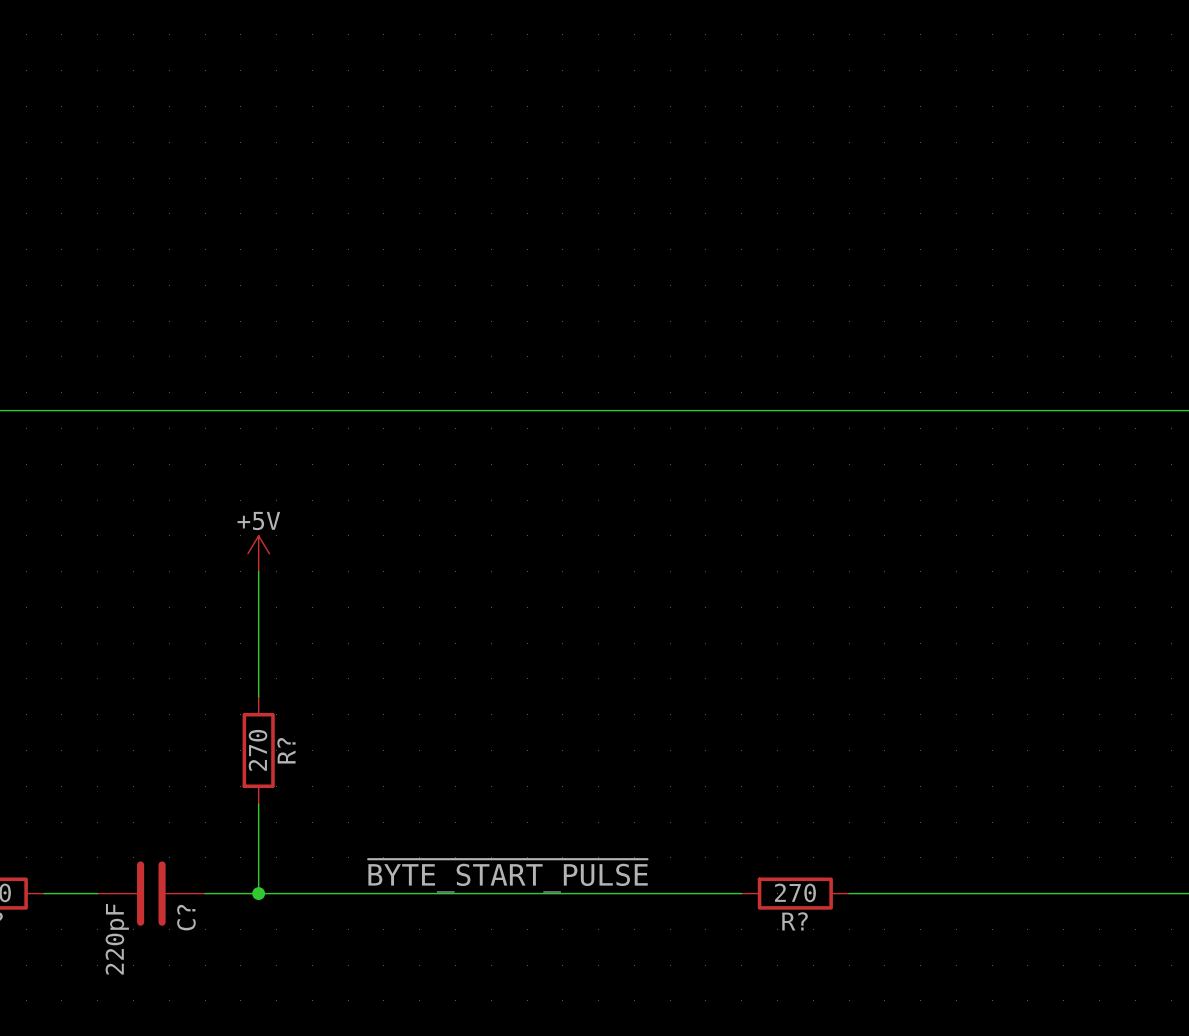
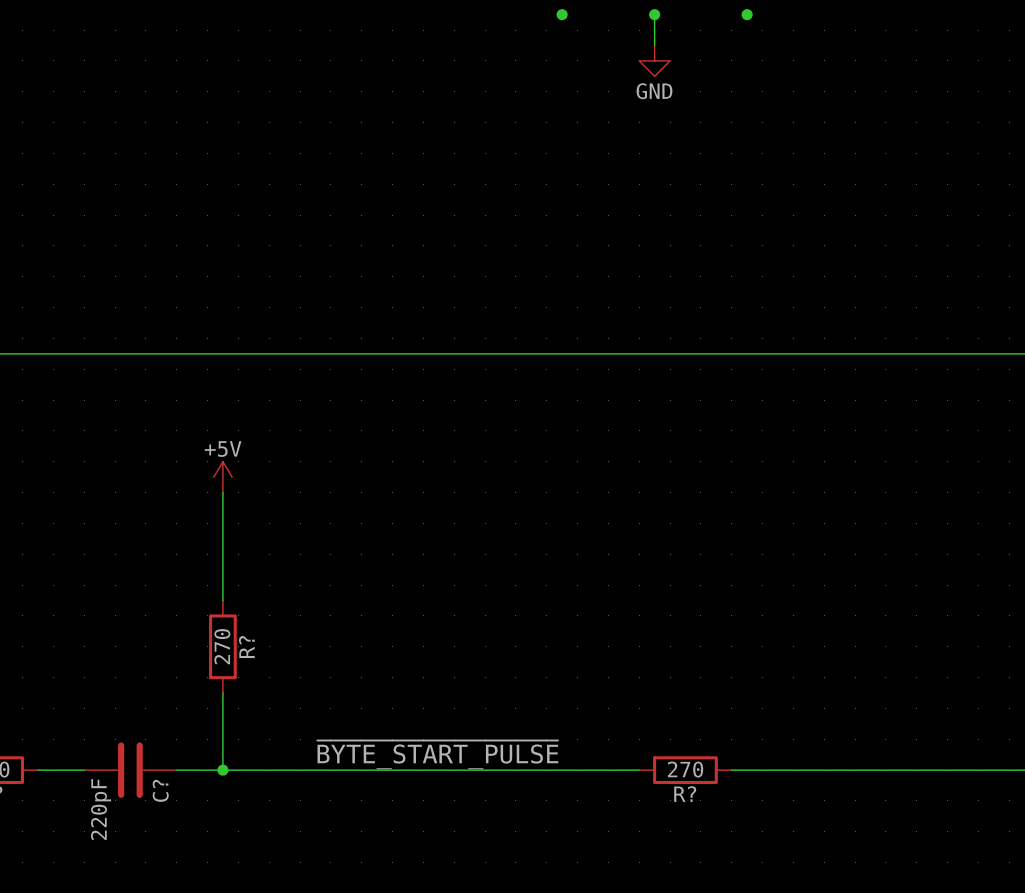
junction: none -> (562, 14)
wire: none -> (654, 14) (654, 45)
junction: none -> (654, 14)
junction: none -> (747, 14)
power symbol: none -> GND (654, 60)

